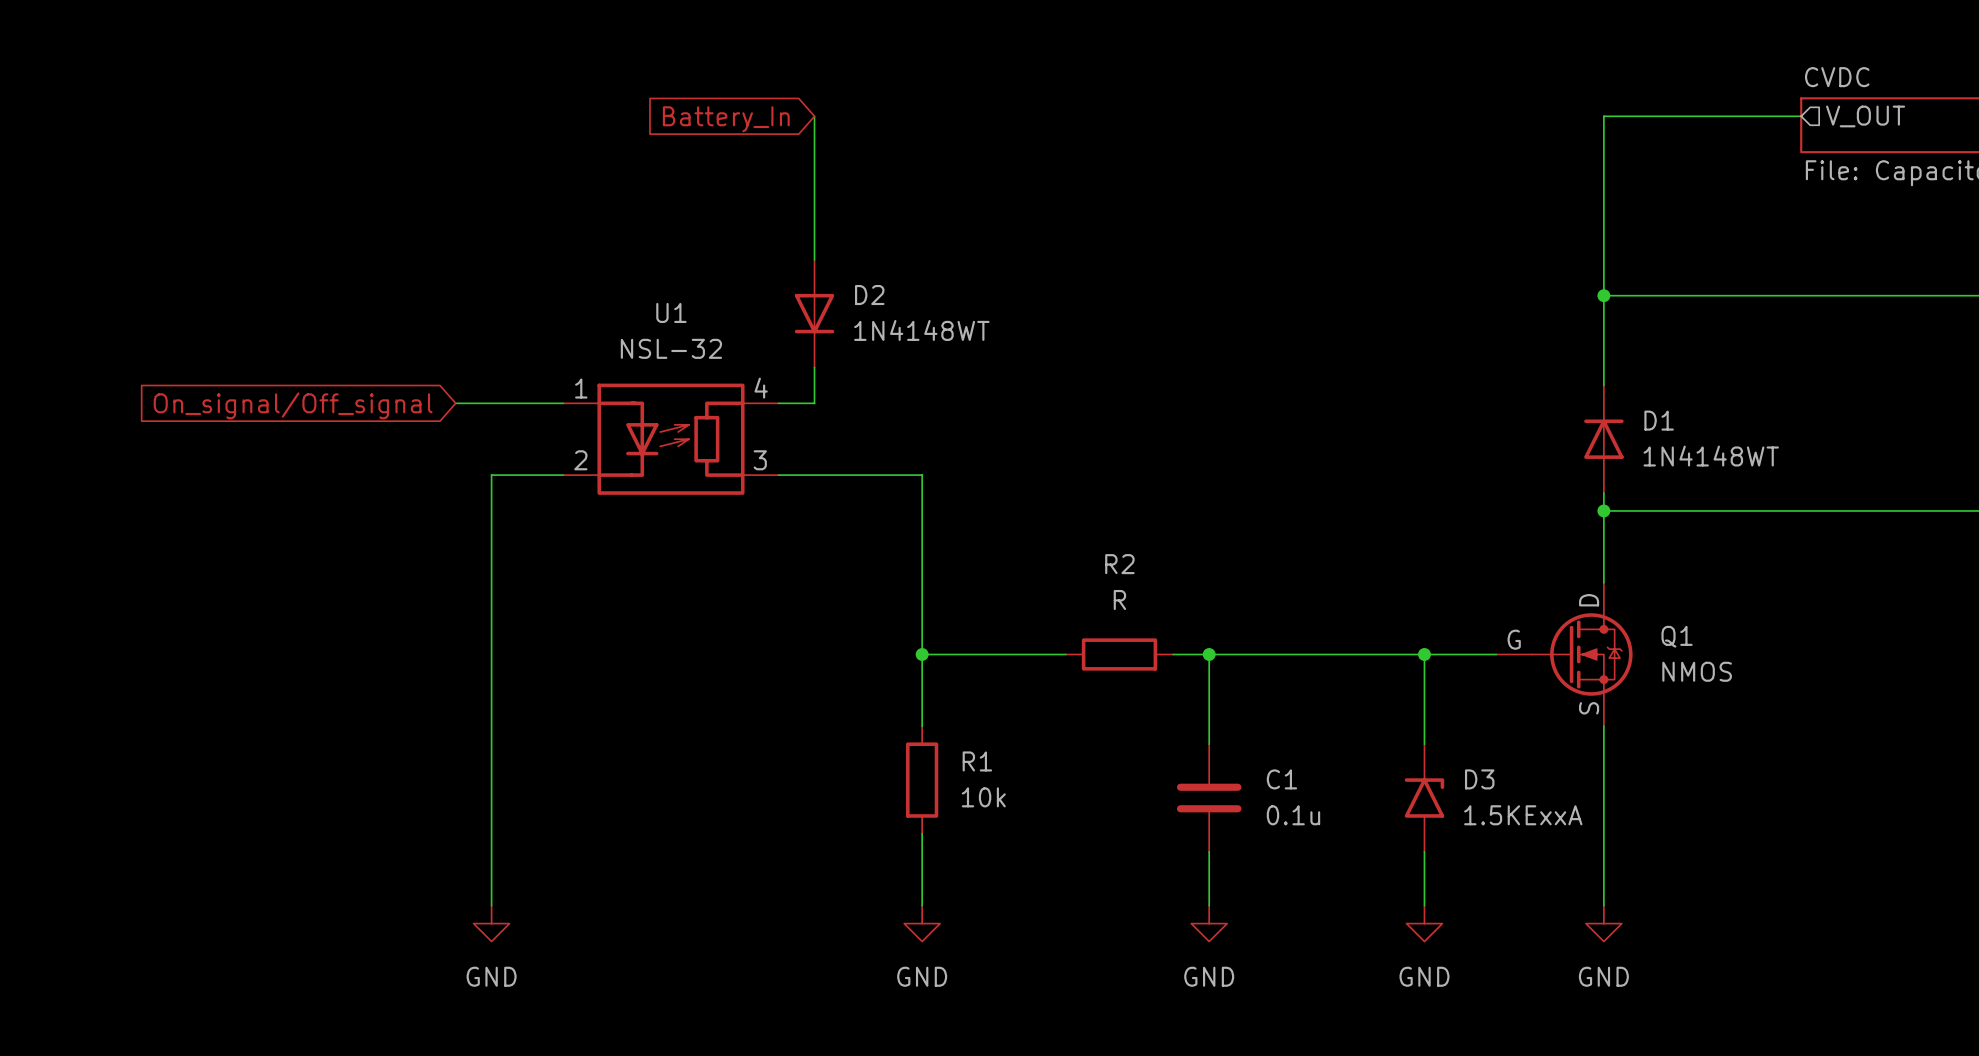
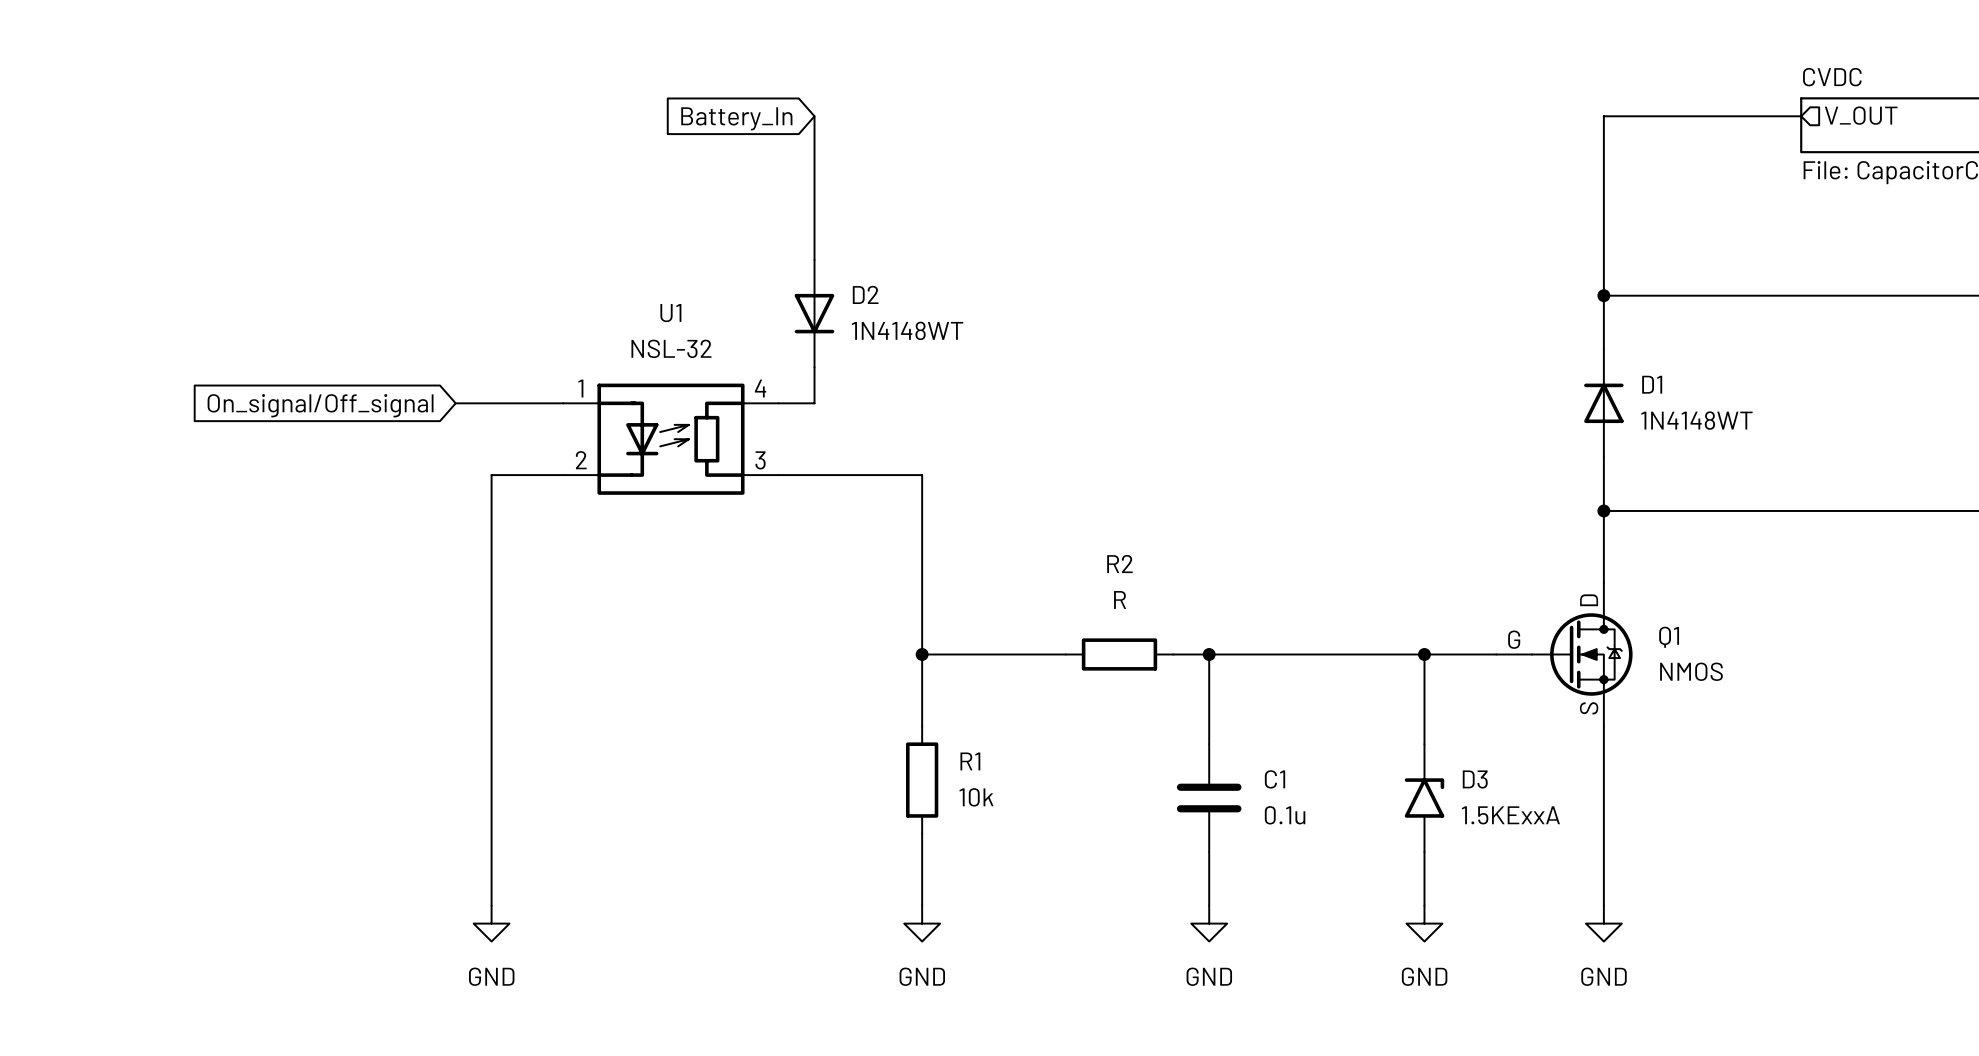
D1 position: (1603, 439) -> (1603, 403)

